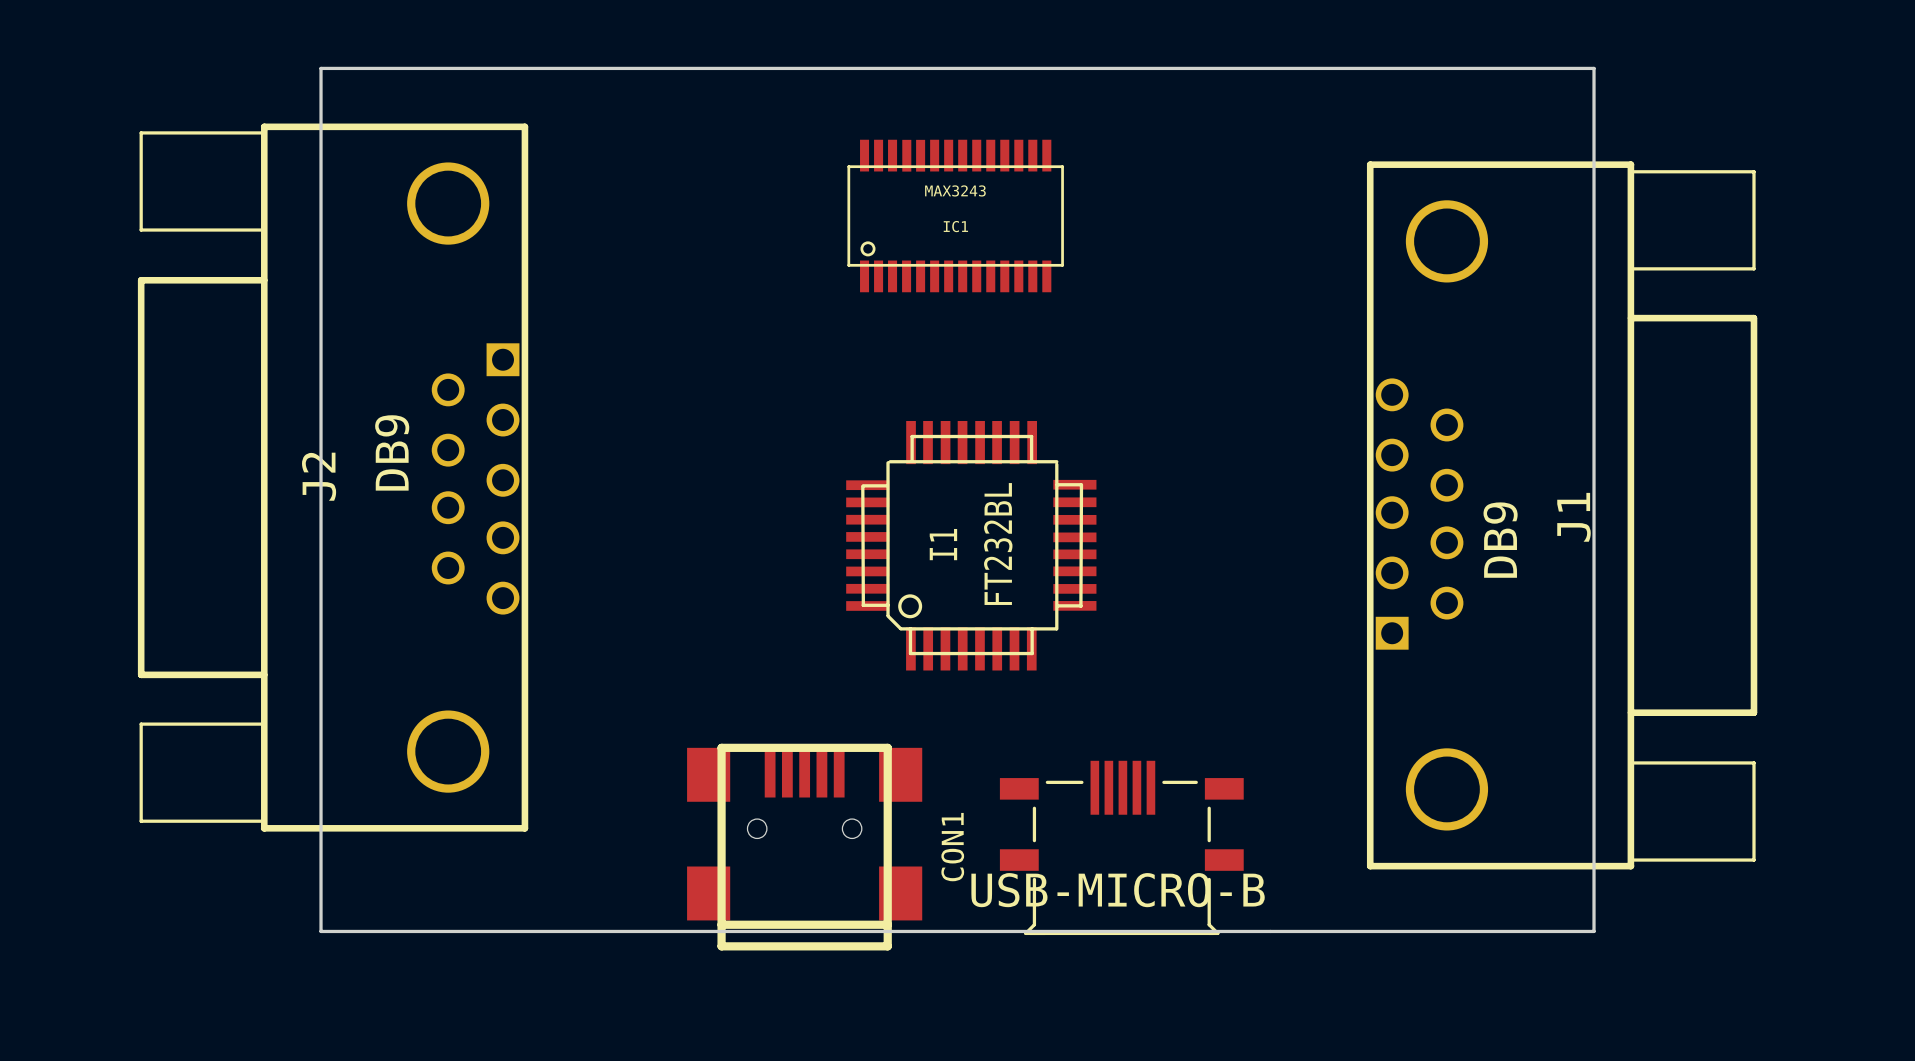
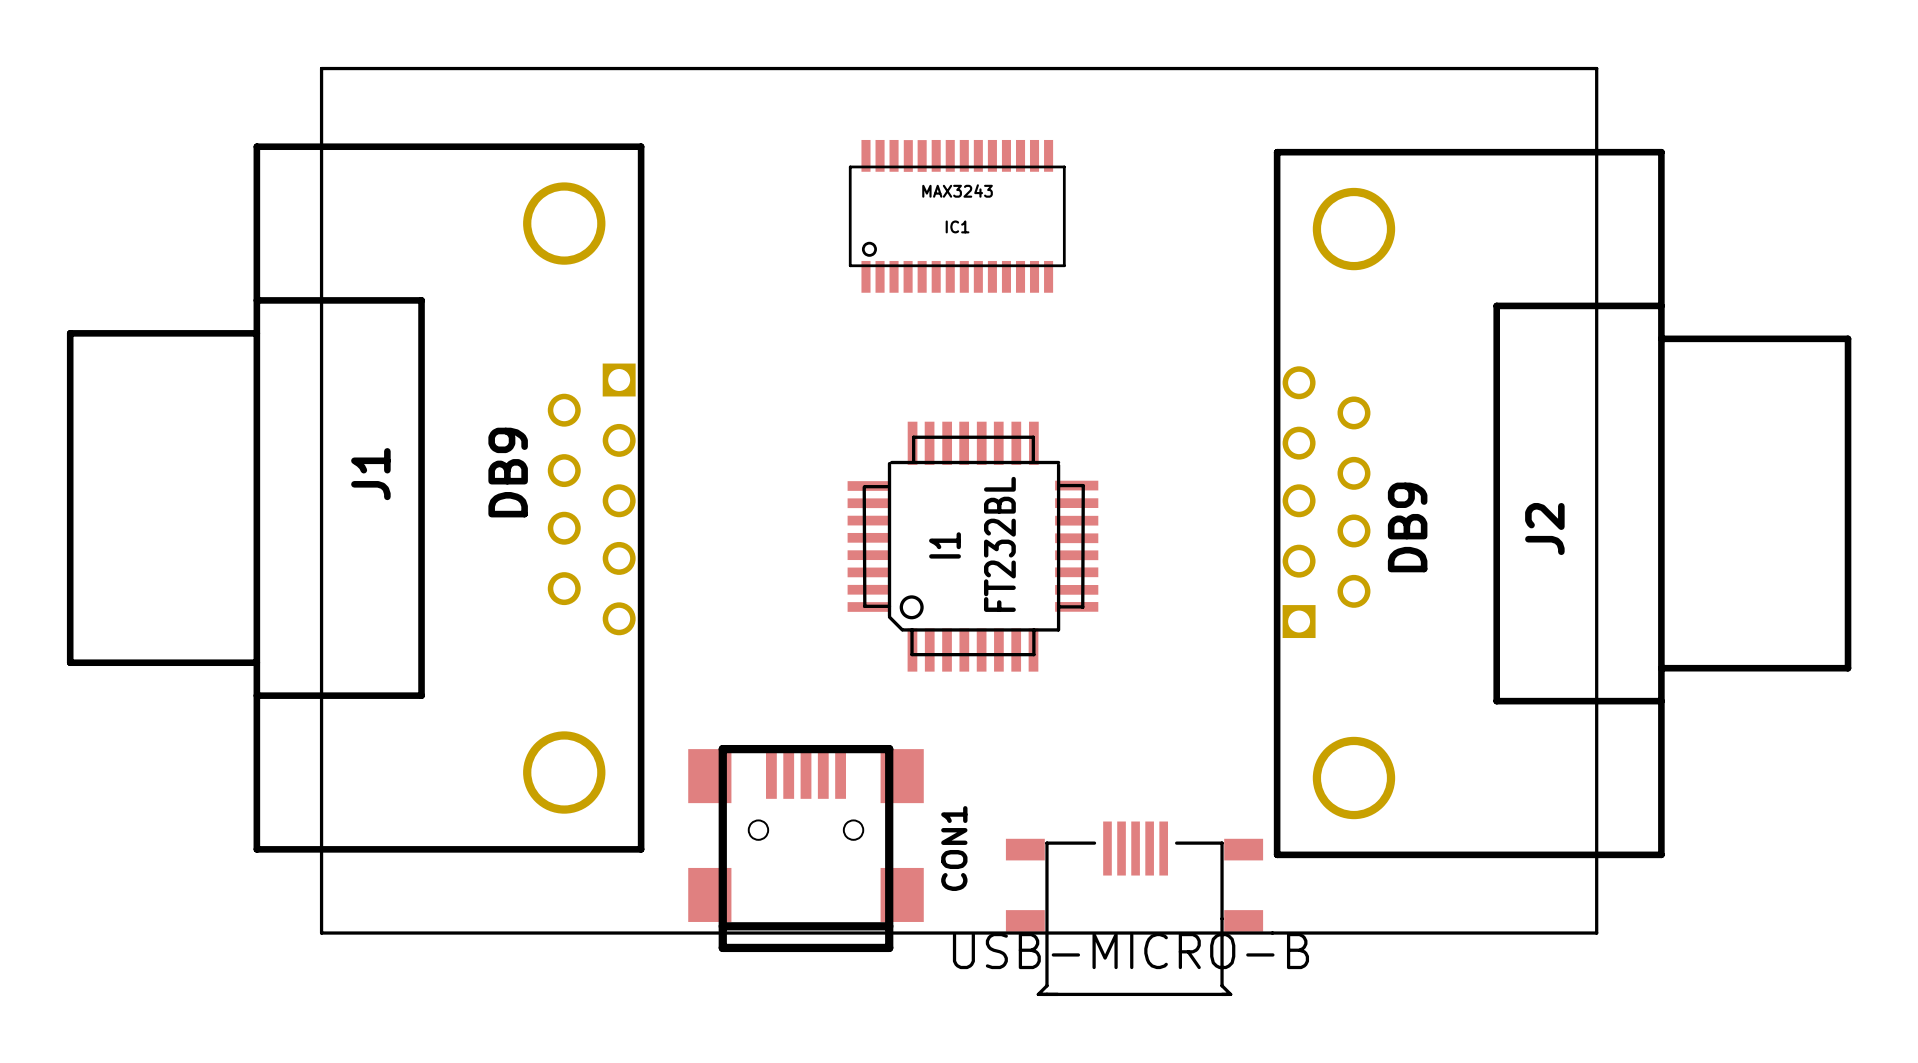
J2 footprint: [137, 123, 529, 832] -> [1273, 148, 1852, 859]
J1 footprint: [1366, 161, 1758, 870] -> [66, 143, 645, 853]
J2 value position: DB9 (392, 452) -> DB9 (1407, 527)
J1 value position: DB9 (1500, 540) -> DB9 (508, 472)
part: USB-MICRO-B (1121, 847) -> none
part: none -> USB-MICRO-B (1134, 908)

